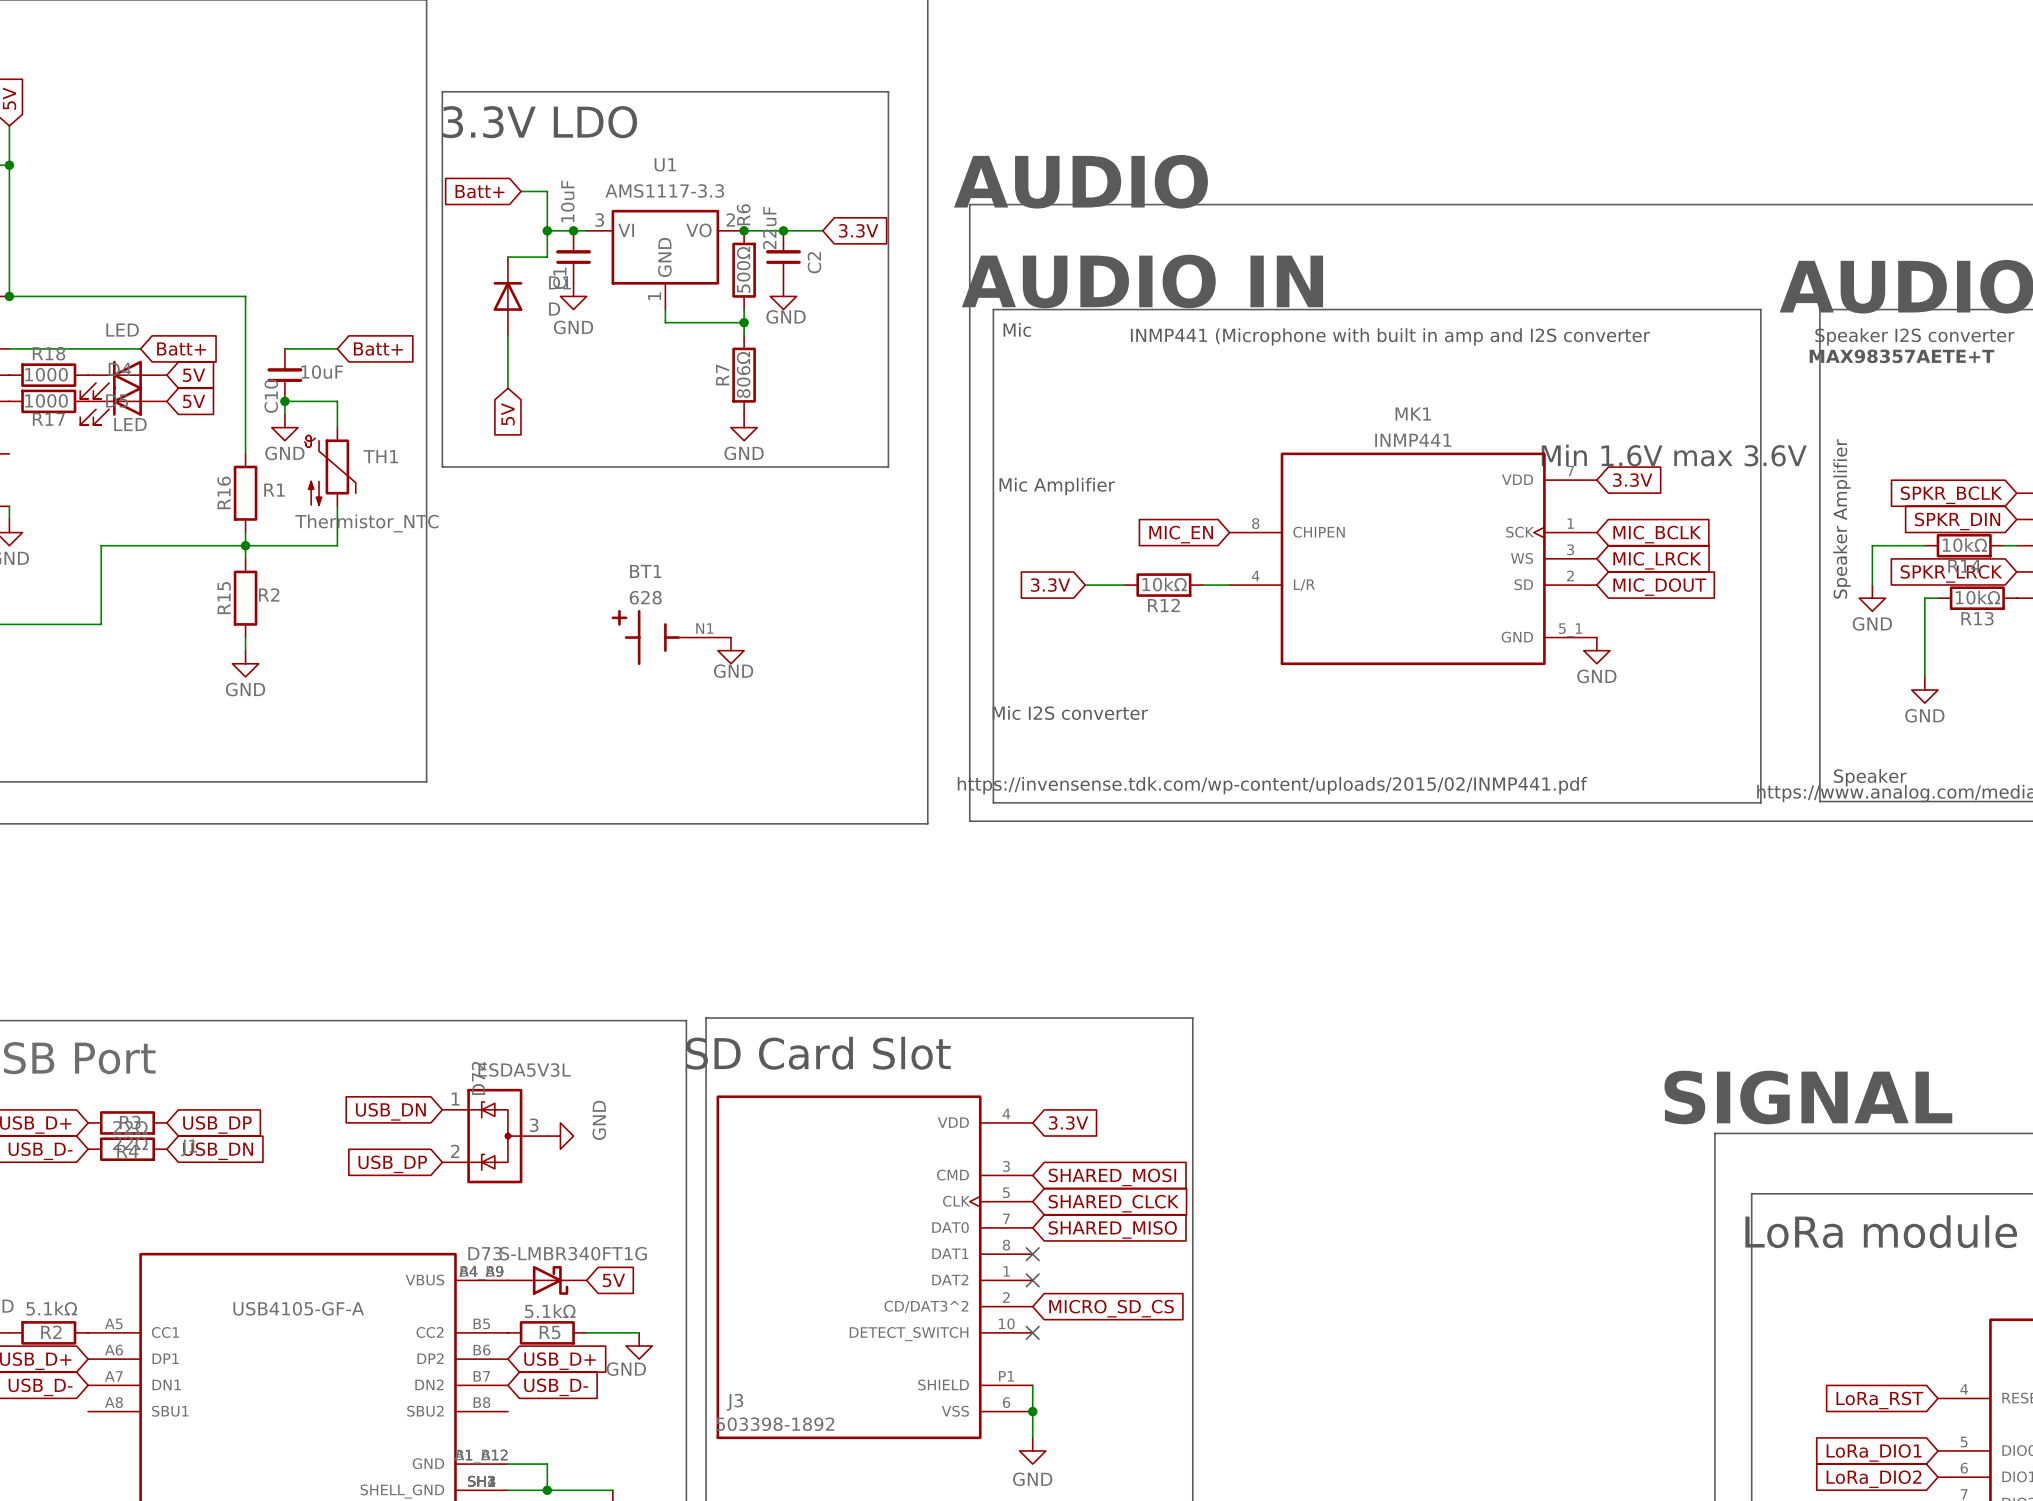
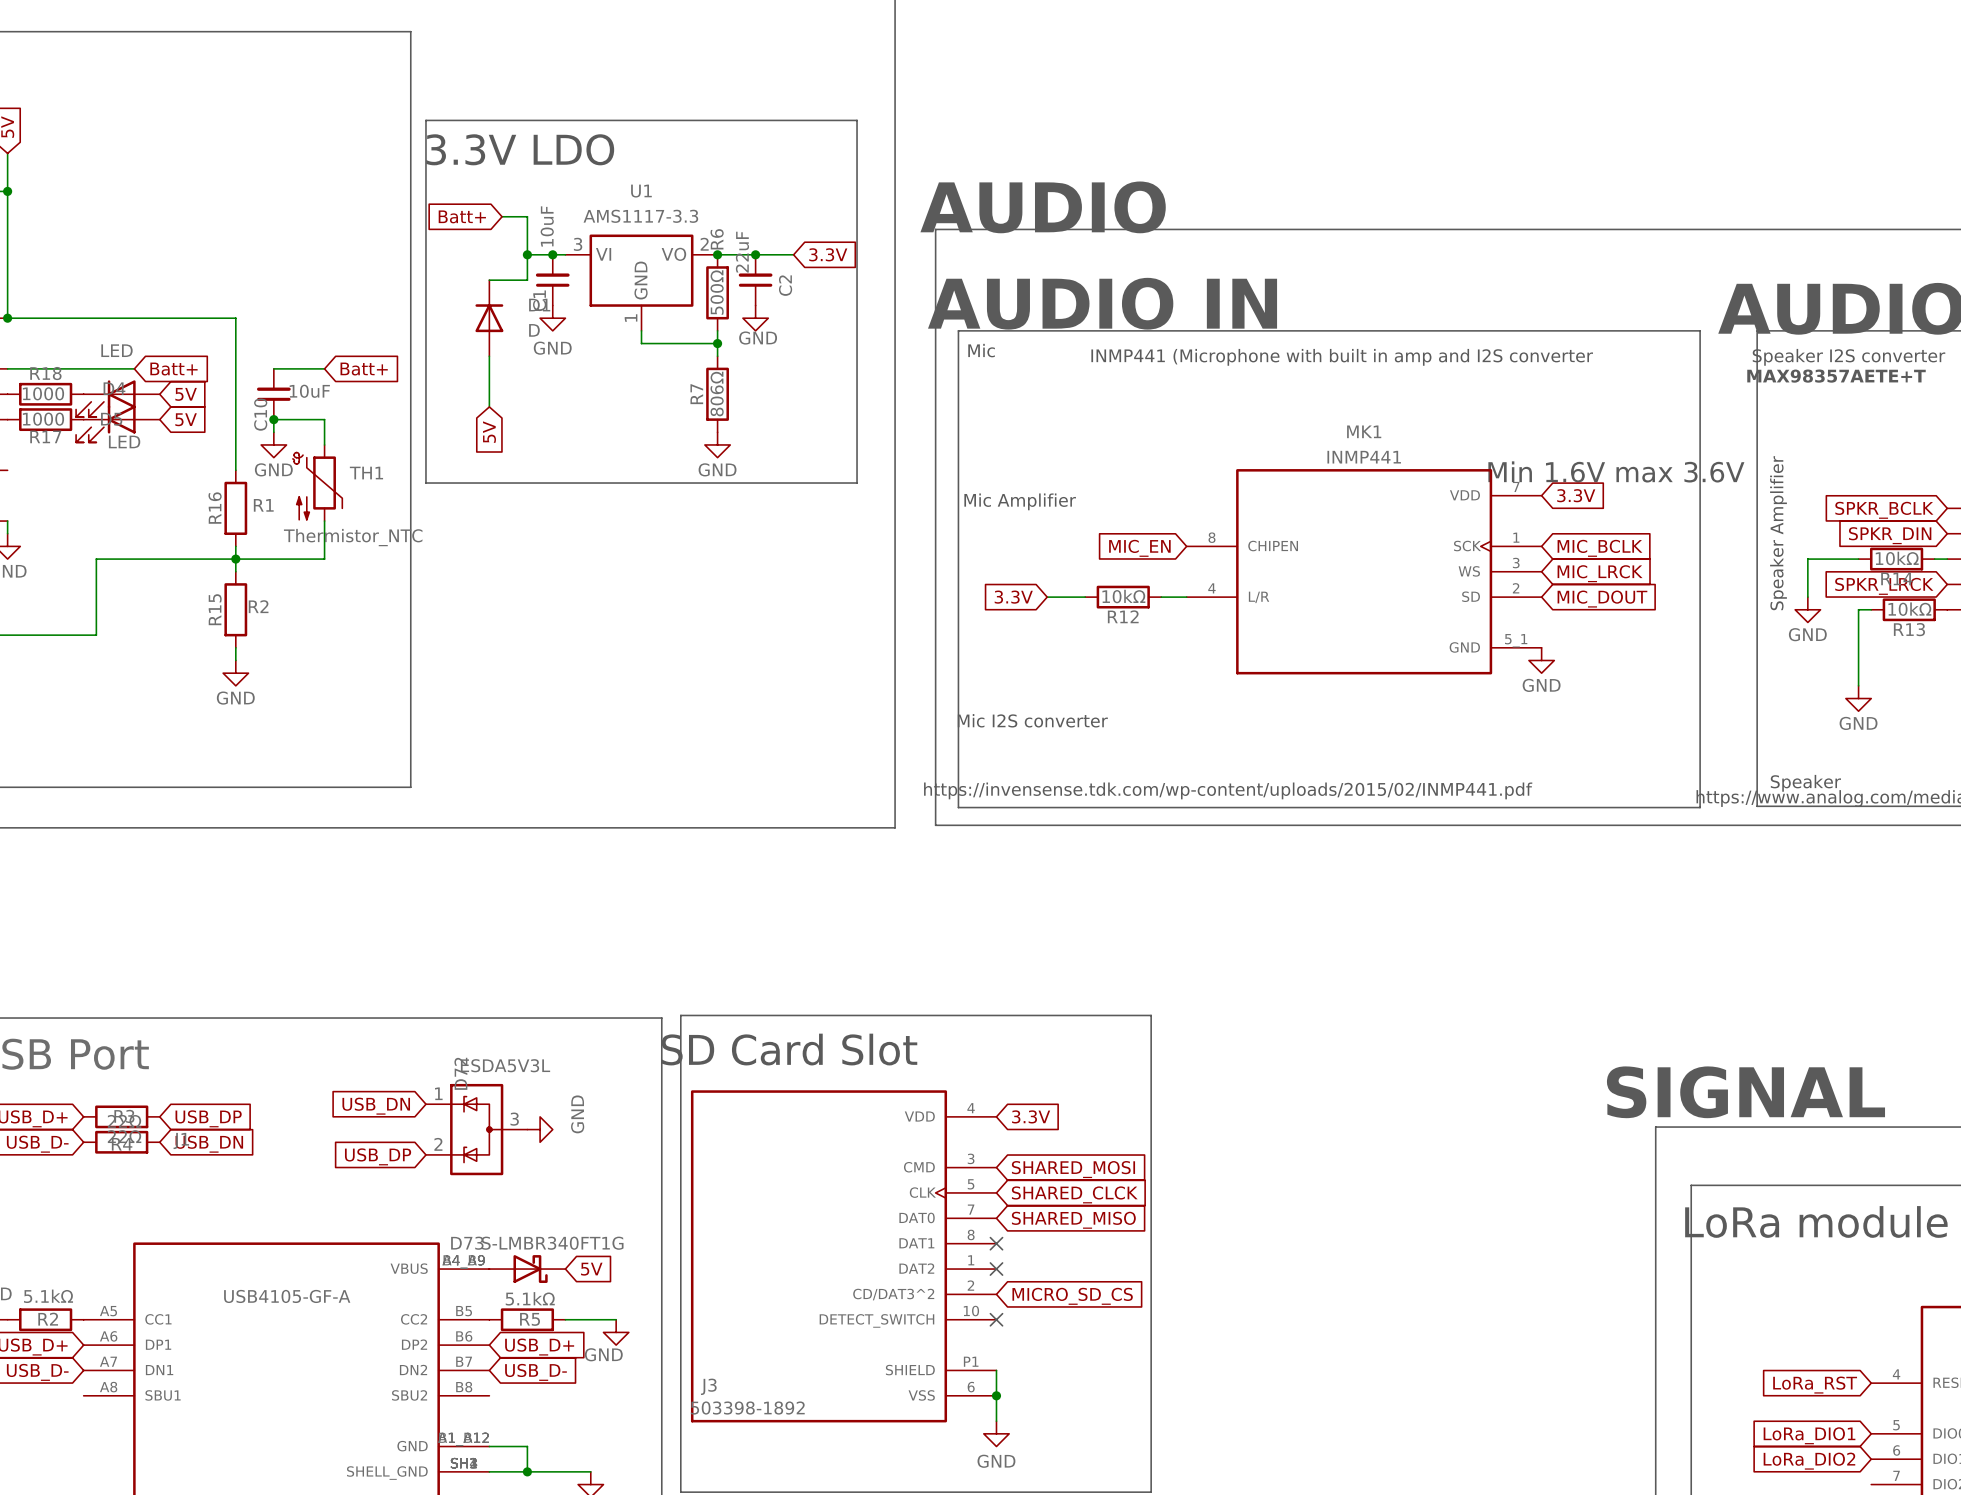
BT1: 628 (671, 637) -> none
power symbol: GND (730, 650) -> none

